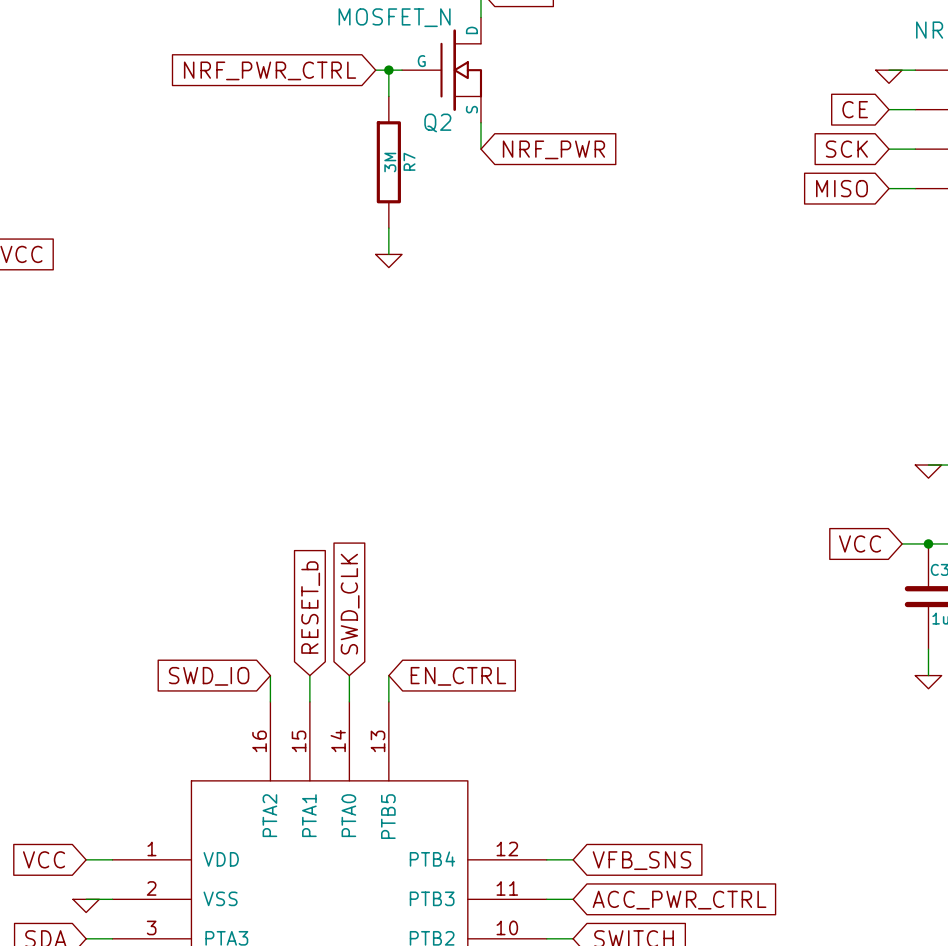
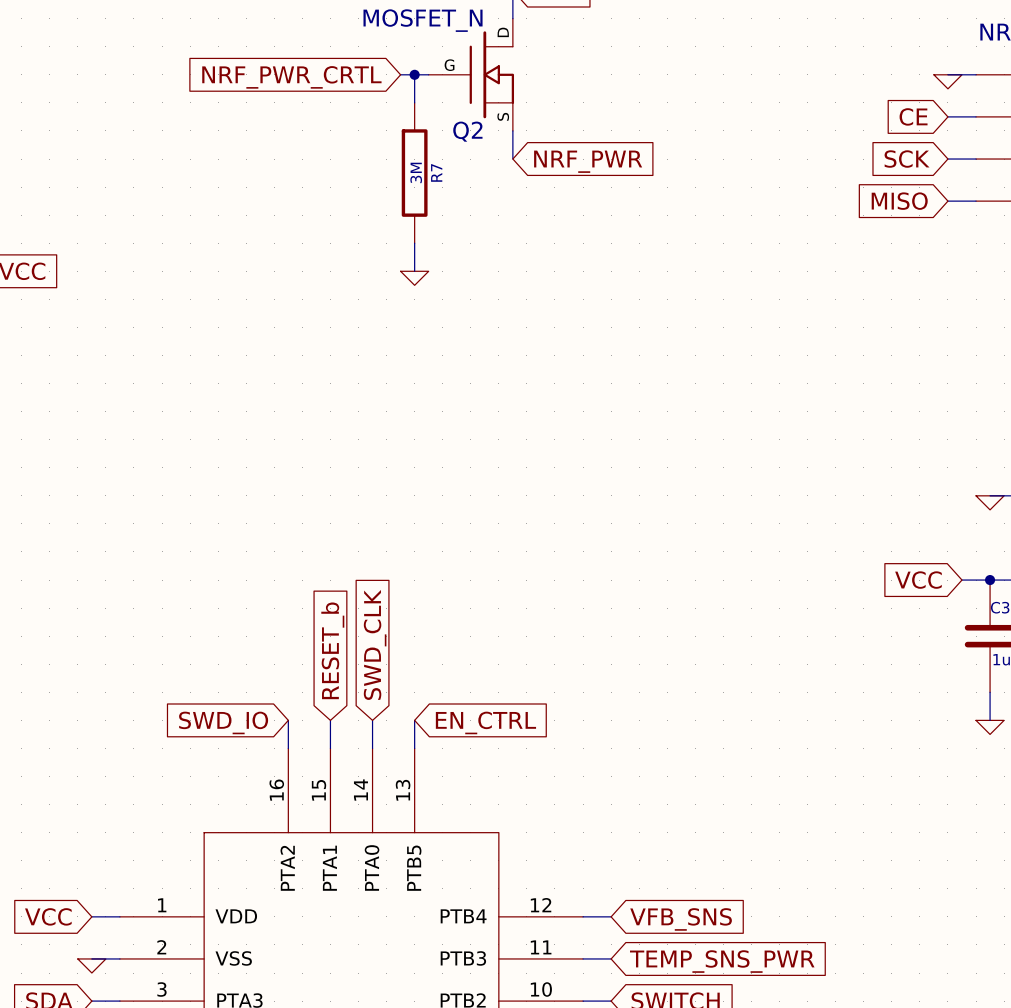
global label: NRF_PWR_CTRL (270, 70) -> NRF_PWR_CRTL (291, 77)
global label: ACC_PWR_CTRL (679, 900) -> TEMP_SNS_PWR (722, 961)

